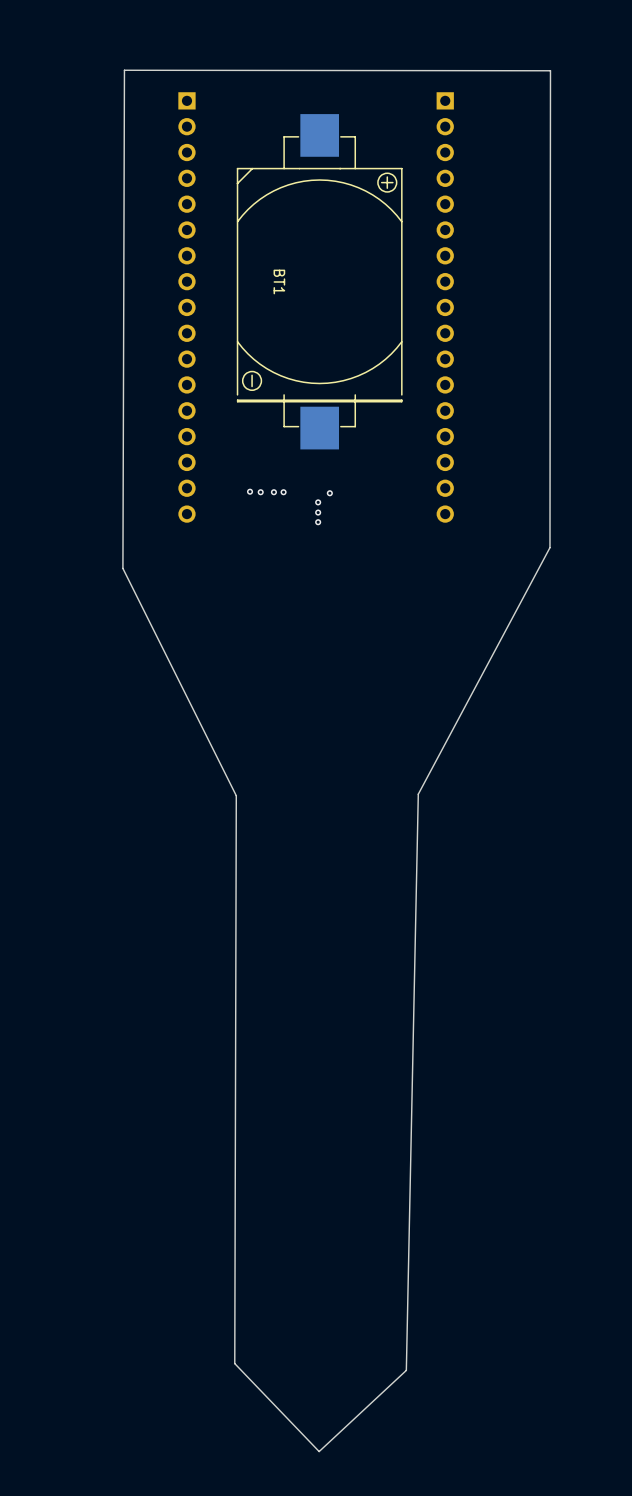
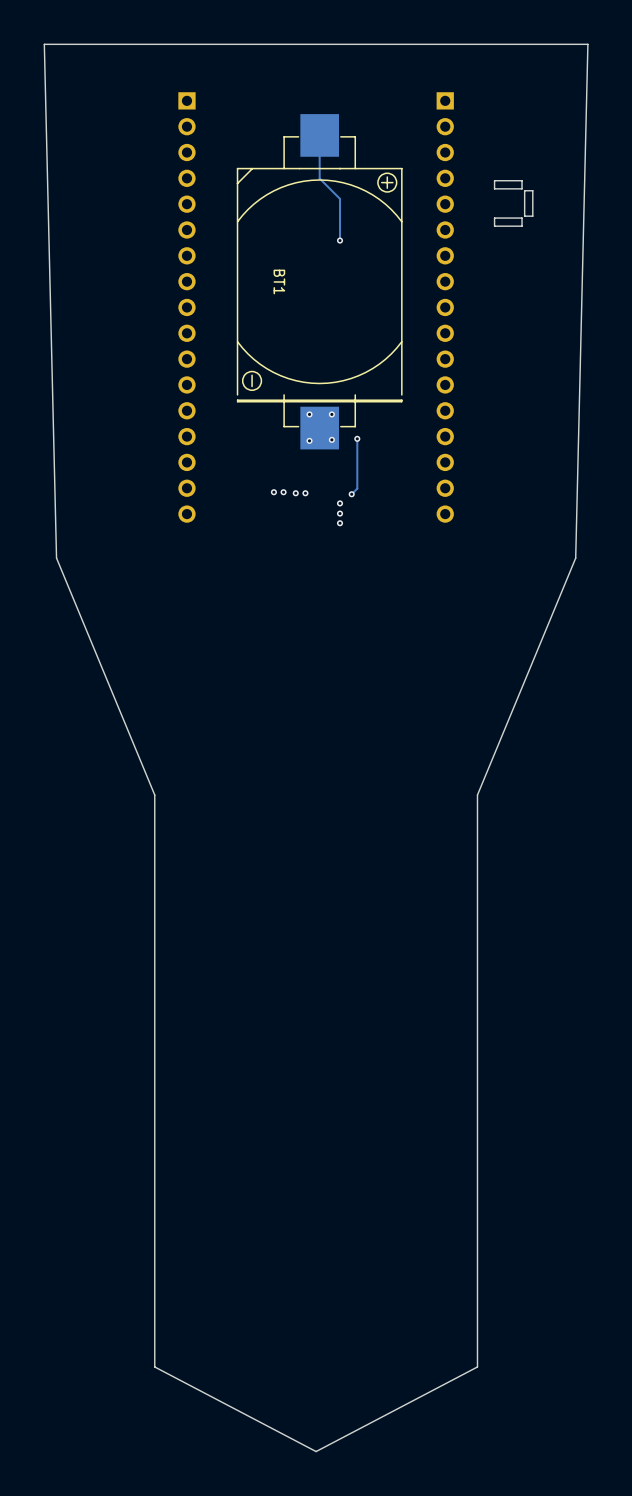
board edge: (124, 70) (122, 568) (236, 795) (234, 1363) (319, 1451) (406, 1370) (418, 794) (549, 547) (550, 70) (124, 70) -> (587, 44) (575, 558) (477, 795) (477, 1366) (316, 1451) (154, 1366) (154, 795) (56, 558) (44, 44) (587, 44)
track: none -> (319, 135) (319, 178) (340, 198) (340, 240)
board edge: none -> (522, 180) (494, 180) (494, 188) (522, 188) (522, 180)
board edge: none -> (532, 190) (524, 190) (524, 216) (532, 216) (532, 190)
board edge: none -> (522, 218) (522, 226) (494, 226) (494, 218) (522, 218)
via: none -> (340, 240)
via: none -> (309, 414)
via: none -> (331, 414)
track: none -> (357, 438) (357, 488) (351, 494)
via: none -> (357, 438)
via: none -> (331, 439)
via: none -> (309, 440)
via: (250, 491) -> none
via: (260, 492) -> none
via: none -> (295, 493)
via: none -> (305, 493)
via: (329, 493) -> none
via: none -> (351, 494)
via: (318, 502) -> none
via: none -> (340, 503)
via: (318, 512) -> none
via: none -> (340, 513)
via: (318, 522) -> none
via: none -> (340, 523)

